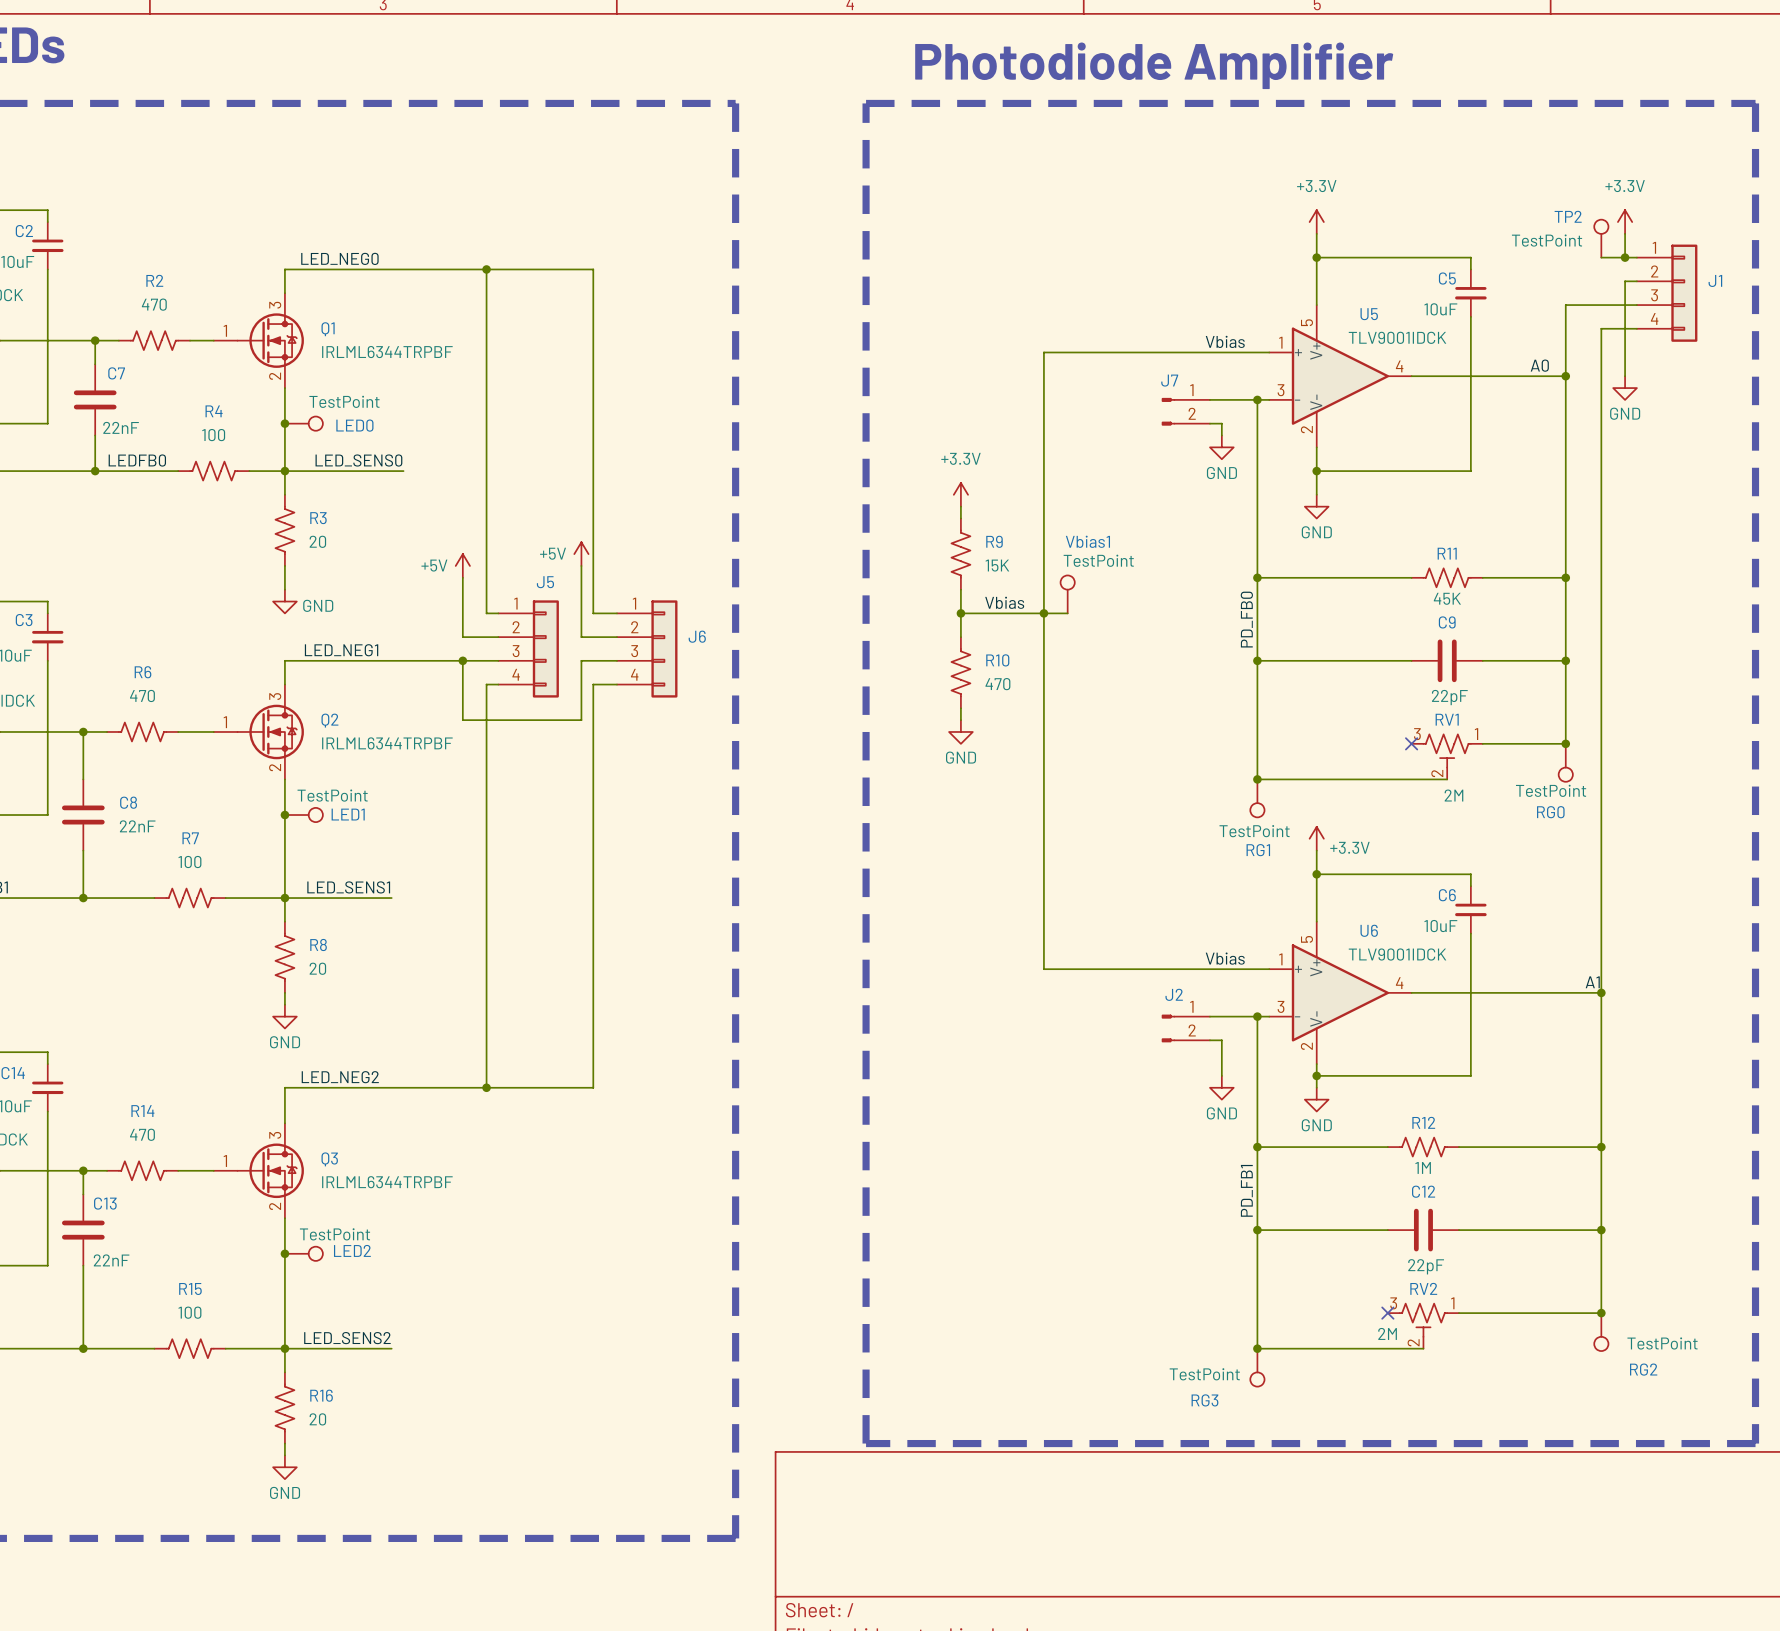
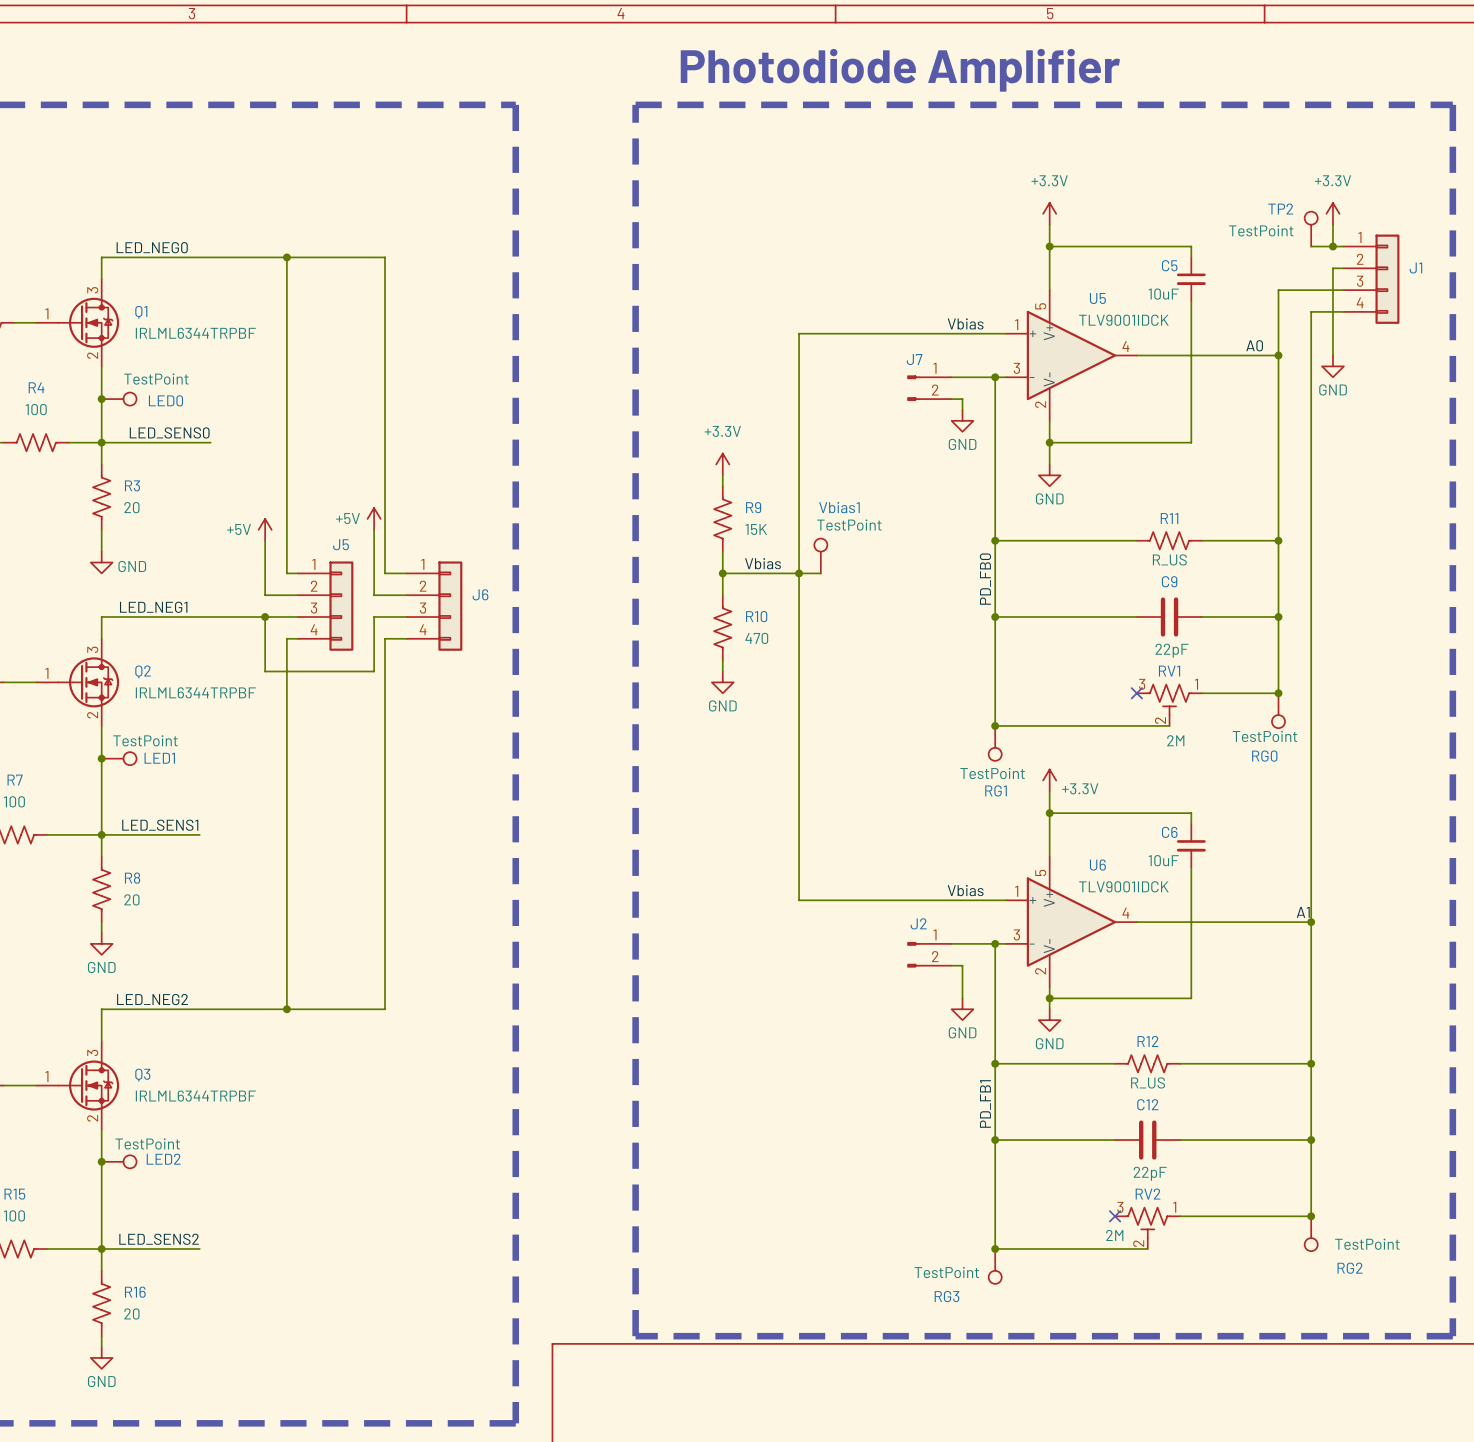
R11 value: 45K (1447, 598) -> R_US (1169, 559)
R12 value: 1M (1423, 1167) -> R_US (1148, 1082)

